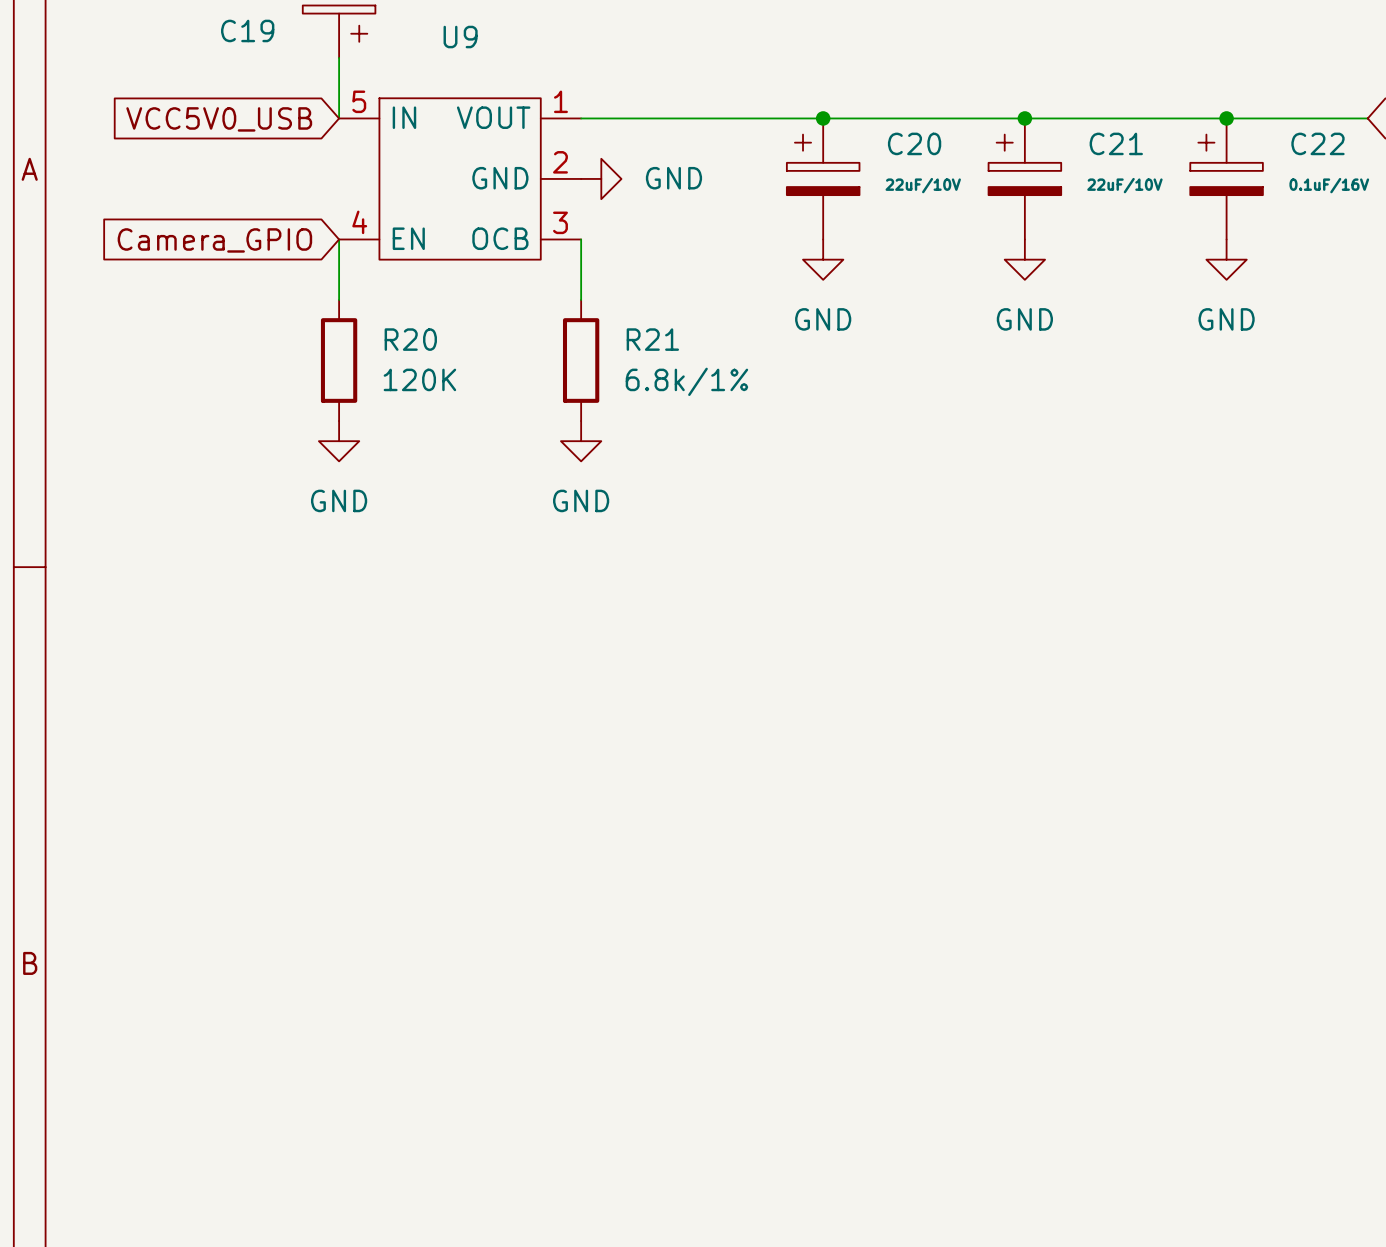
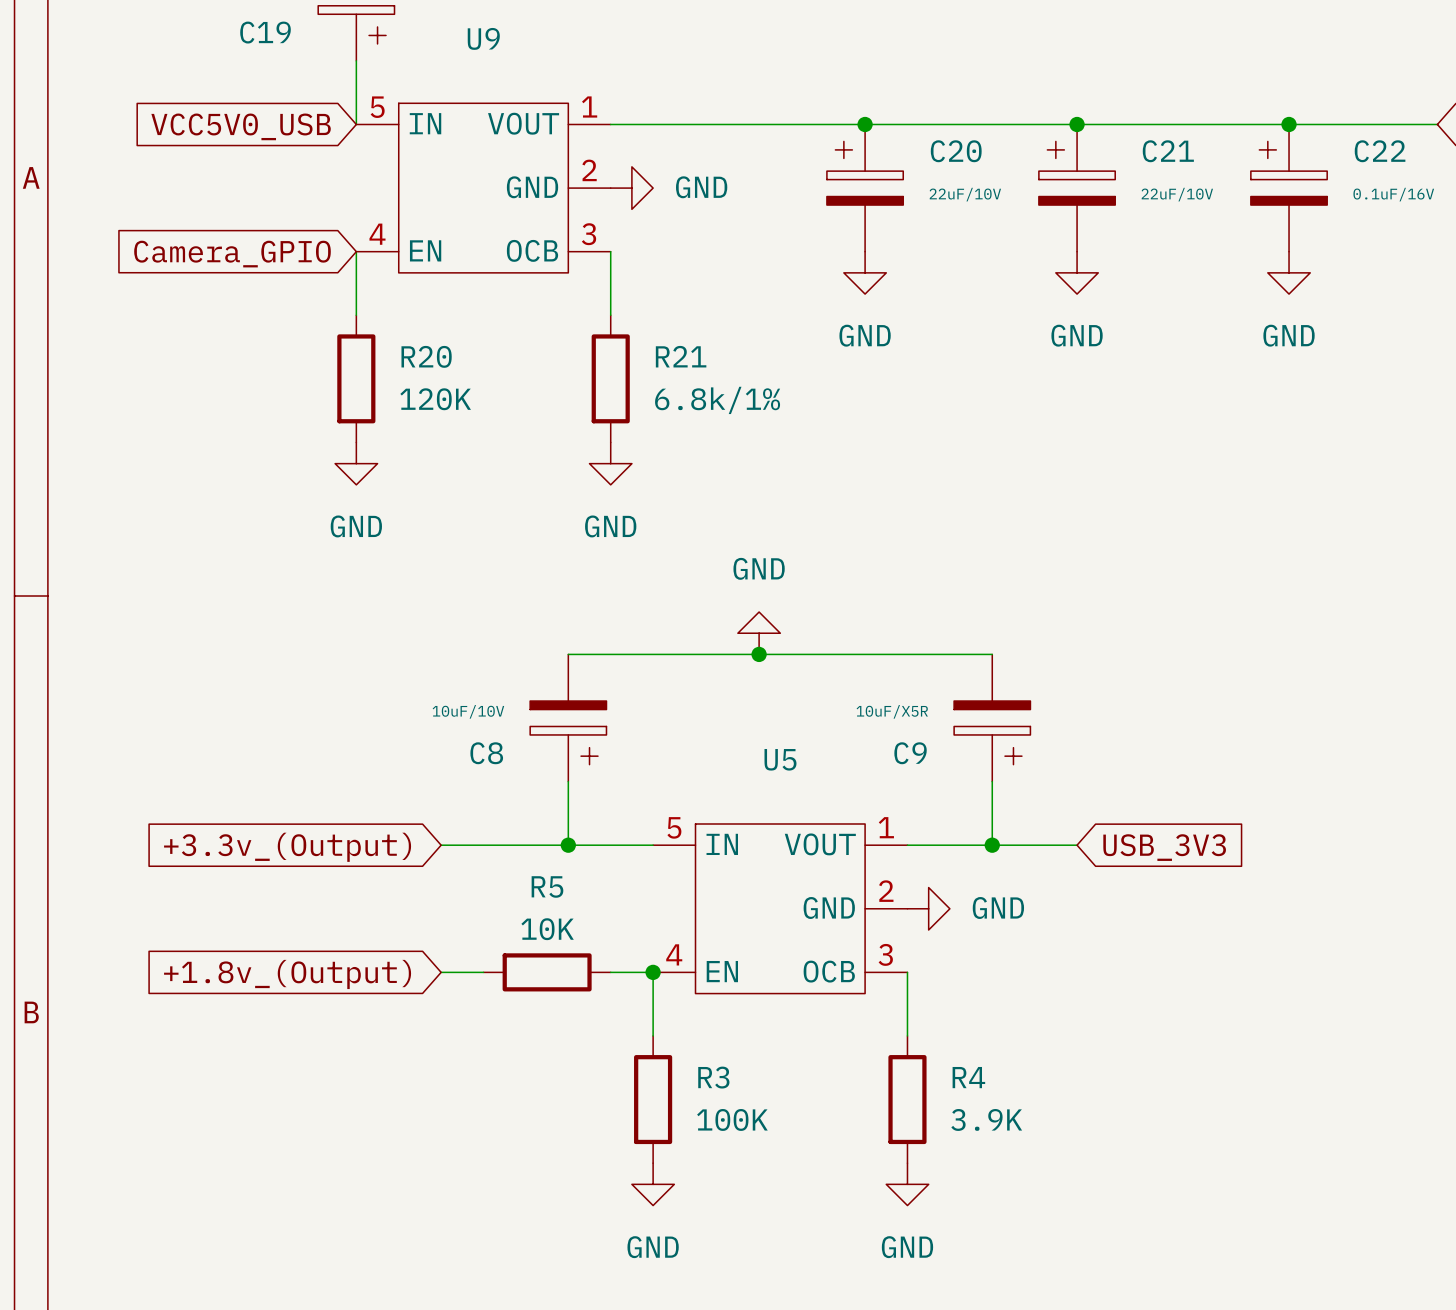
power symbol: none -> GND (759, 633)
wire: none -> (568, 654) (992, 654)
junction: none -> (759, 654)
C8: none -> 10uF/10V (568, 718)
C9: none -> 10uF/X5R (992, 718)
wire: none -> (568, 781) (568, 845)
wire: none -> (992, 781) (992, 845)
wire: none -> (441, 845) (653, 845)
junction: none -> (568, 845)
wire: none -> (907, 845) (1077, 845)
junction: none -> (992, 845)
global label: none -> USB_3V3 (1164, 847)
global label: none -> +3.3v_(Output) (287, 847)
U5: none -> (780, 908)
power symbol: none -> GND (928, 908)
wire: none -> (441, 972) (483, 972)
R5: none -> 10K (547, 972)
wire: none -> (610, 972) (653, 972) (653, 1035)
junction: none -> (653, 972)
wire: none -> (907, 972) (907, 1035)
global label: none -> +1.8v_(Output) (287, 974)
R3: none -> 100K (653, 1099)
R4: none -> 3.9K (907, 1099)
power symbol: none -> GND (653, 1184)
power symbol: none -> GND (907, 1184)

